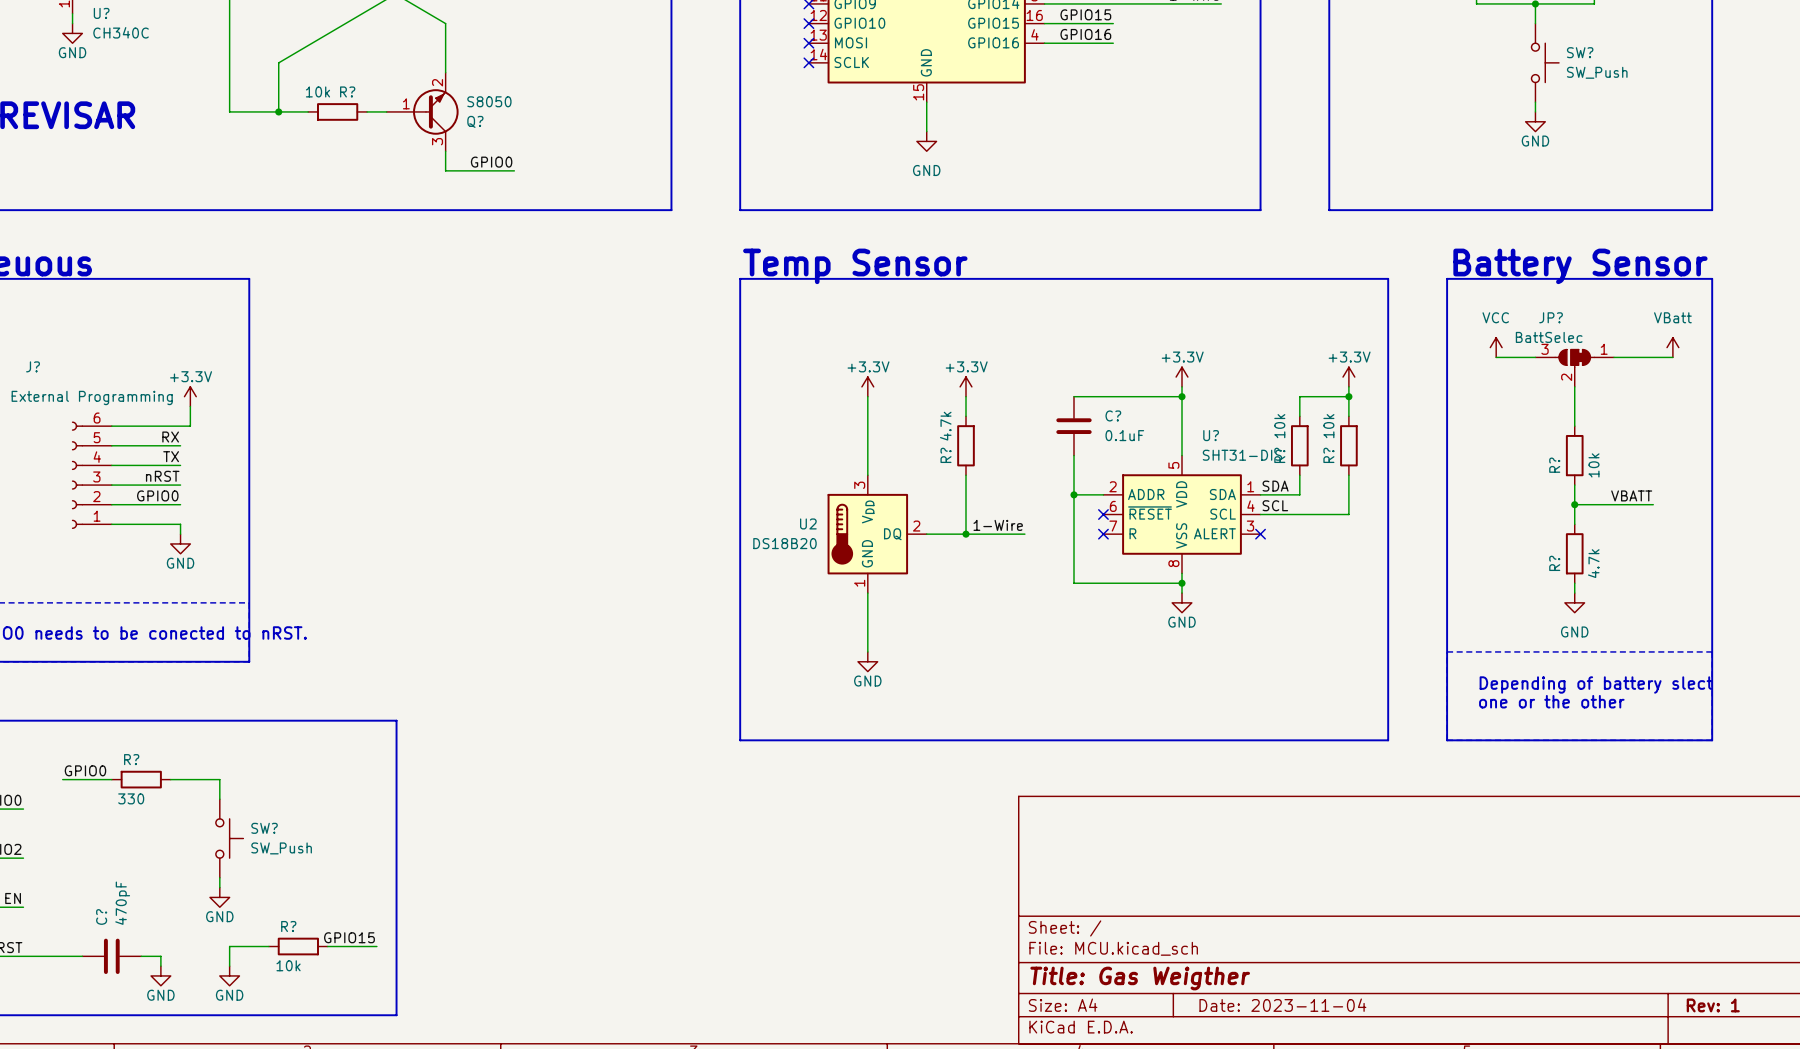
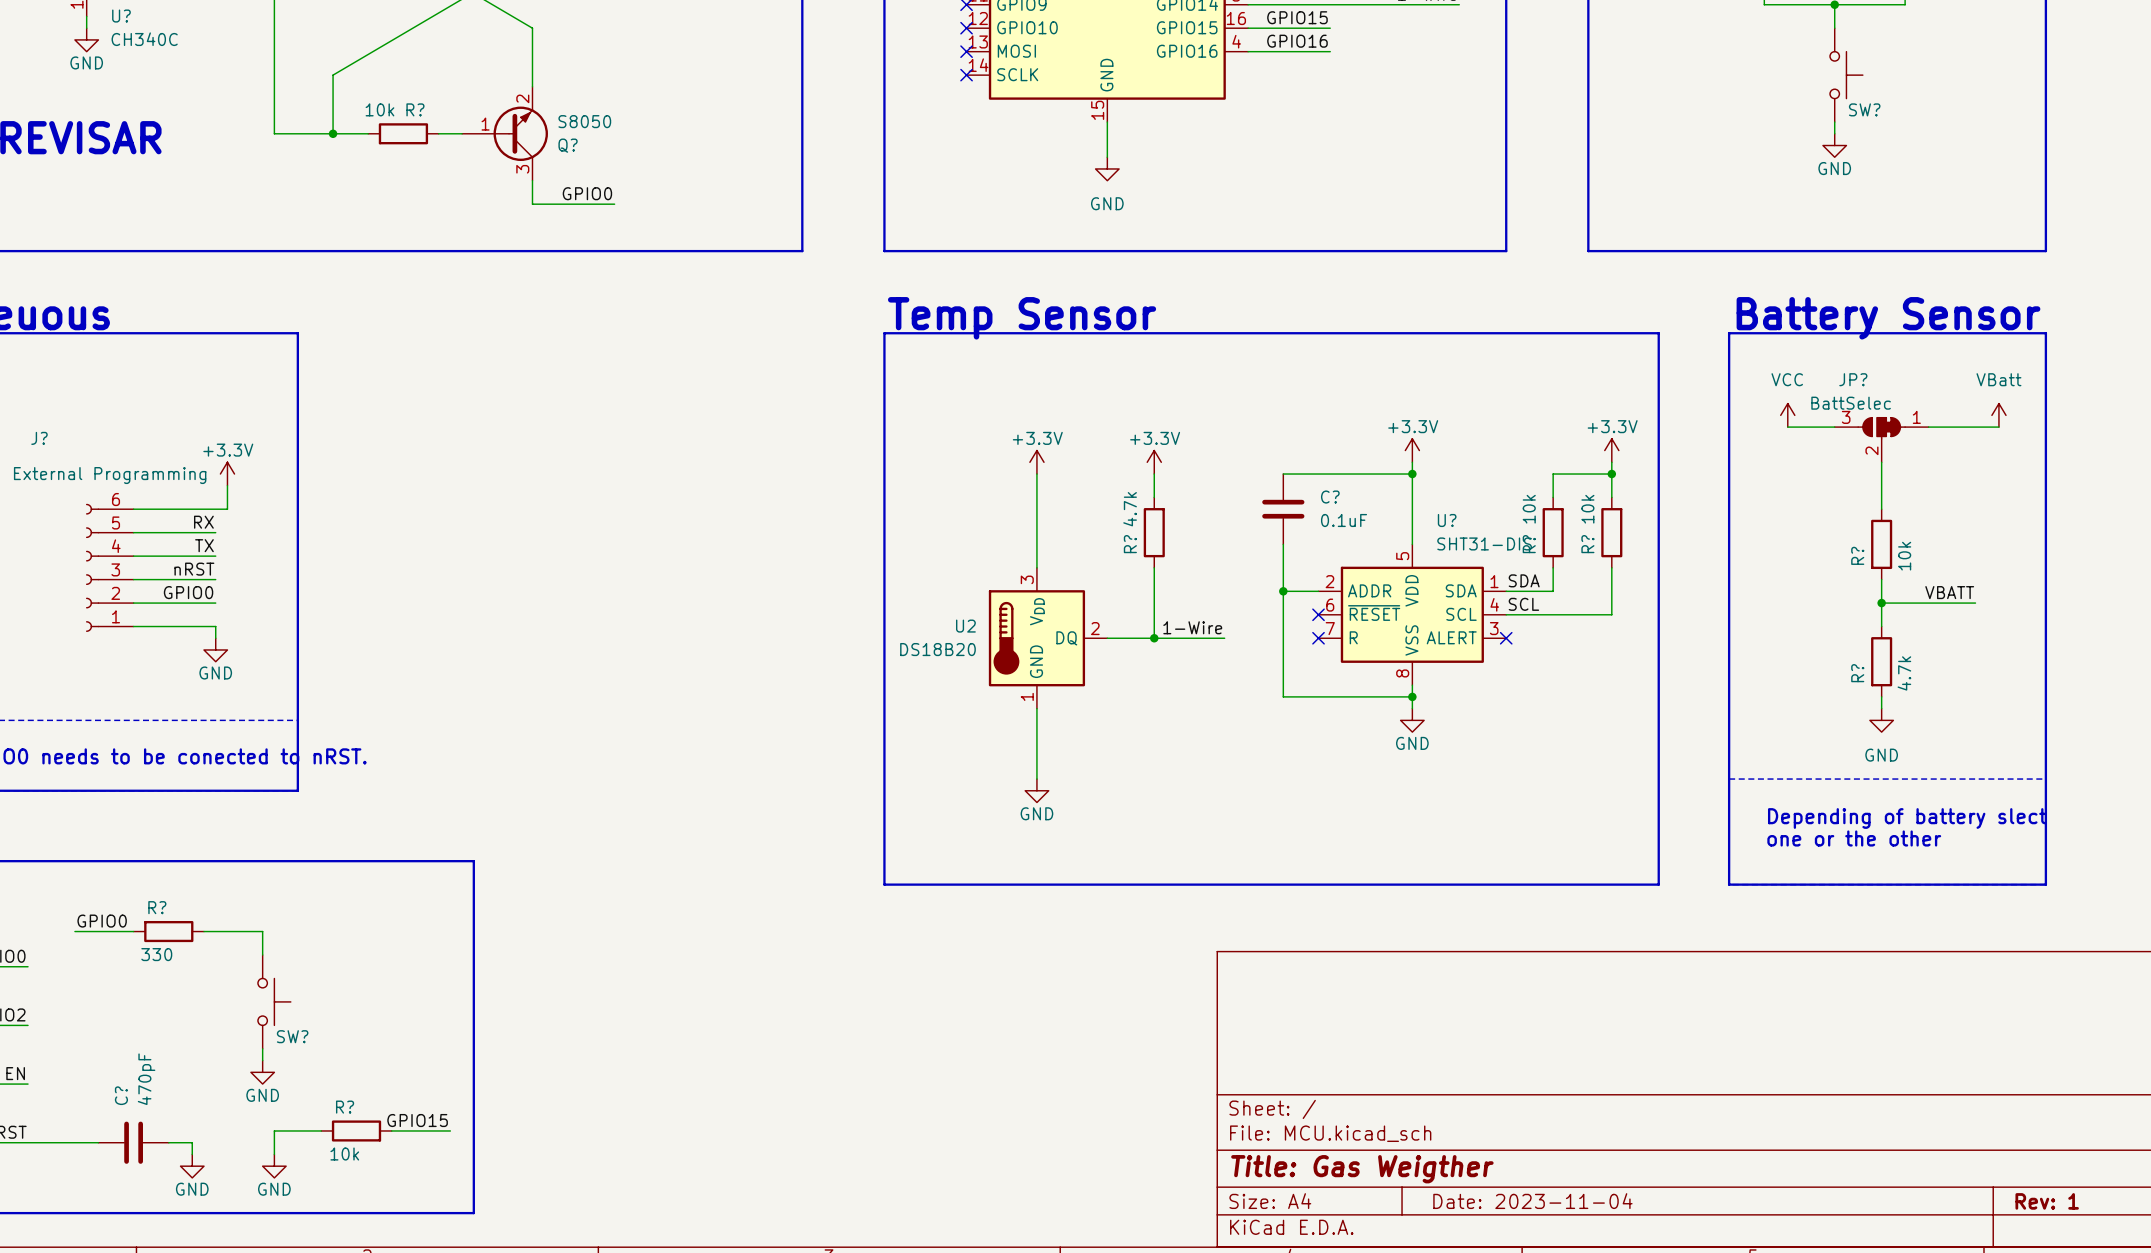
SW? name position: SW? (1580, 52) -> SW? (1864, 109)
SW? value: SW_Push (1597, 72) -> none
SW? name position: SW? (264, 828) -> SW? (292, 1036)
SW? value: SW_Push (281, 848) -> none

